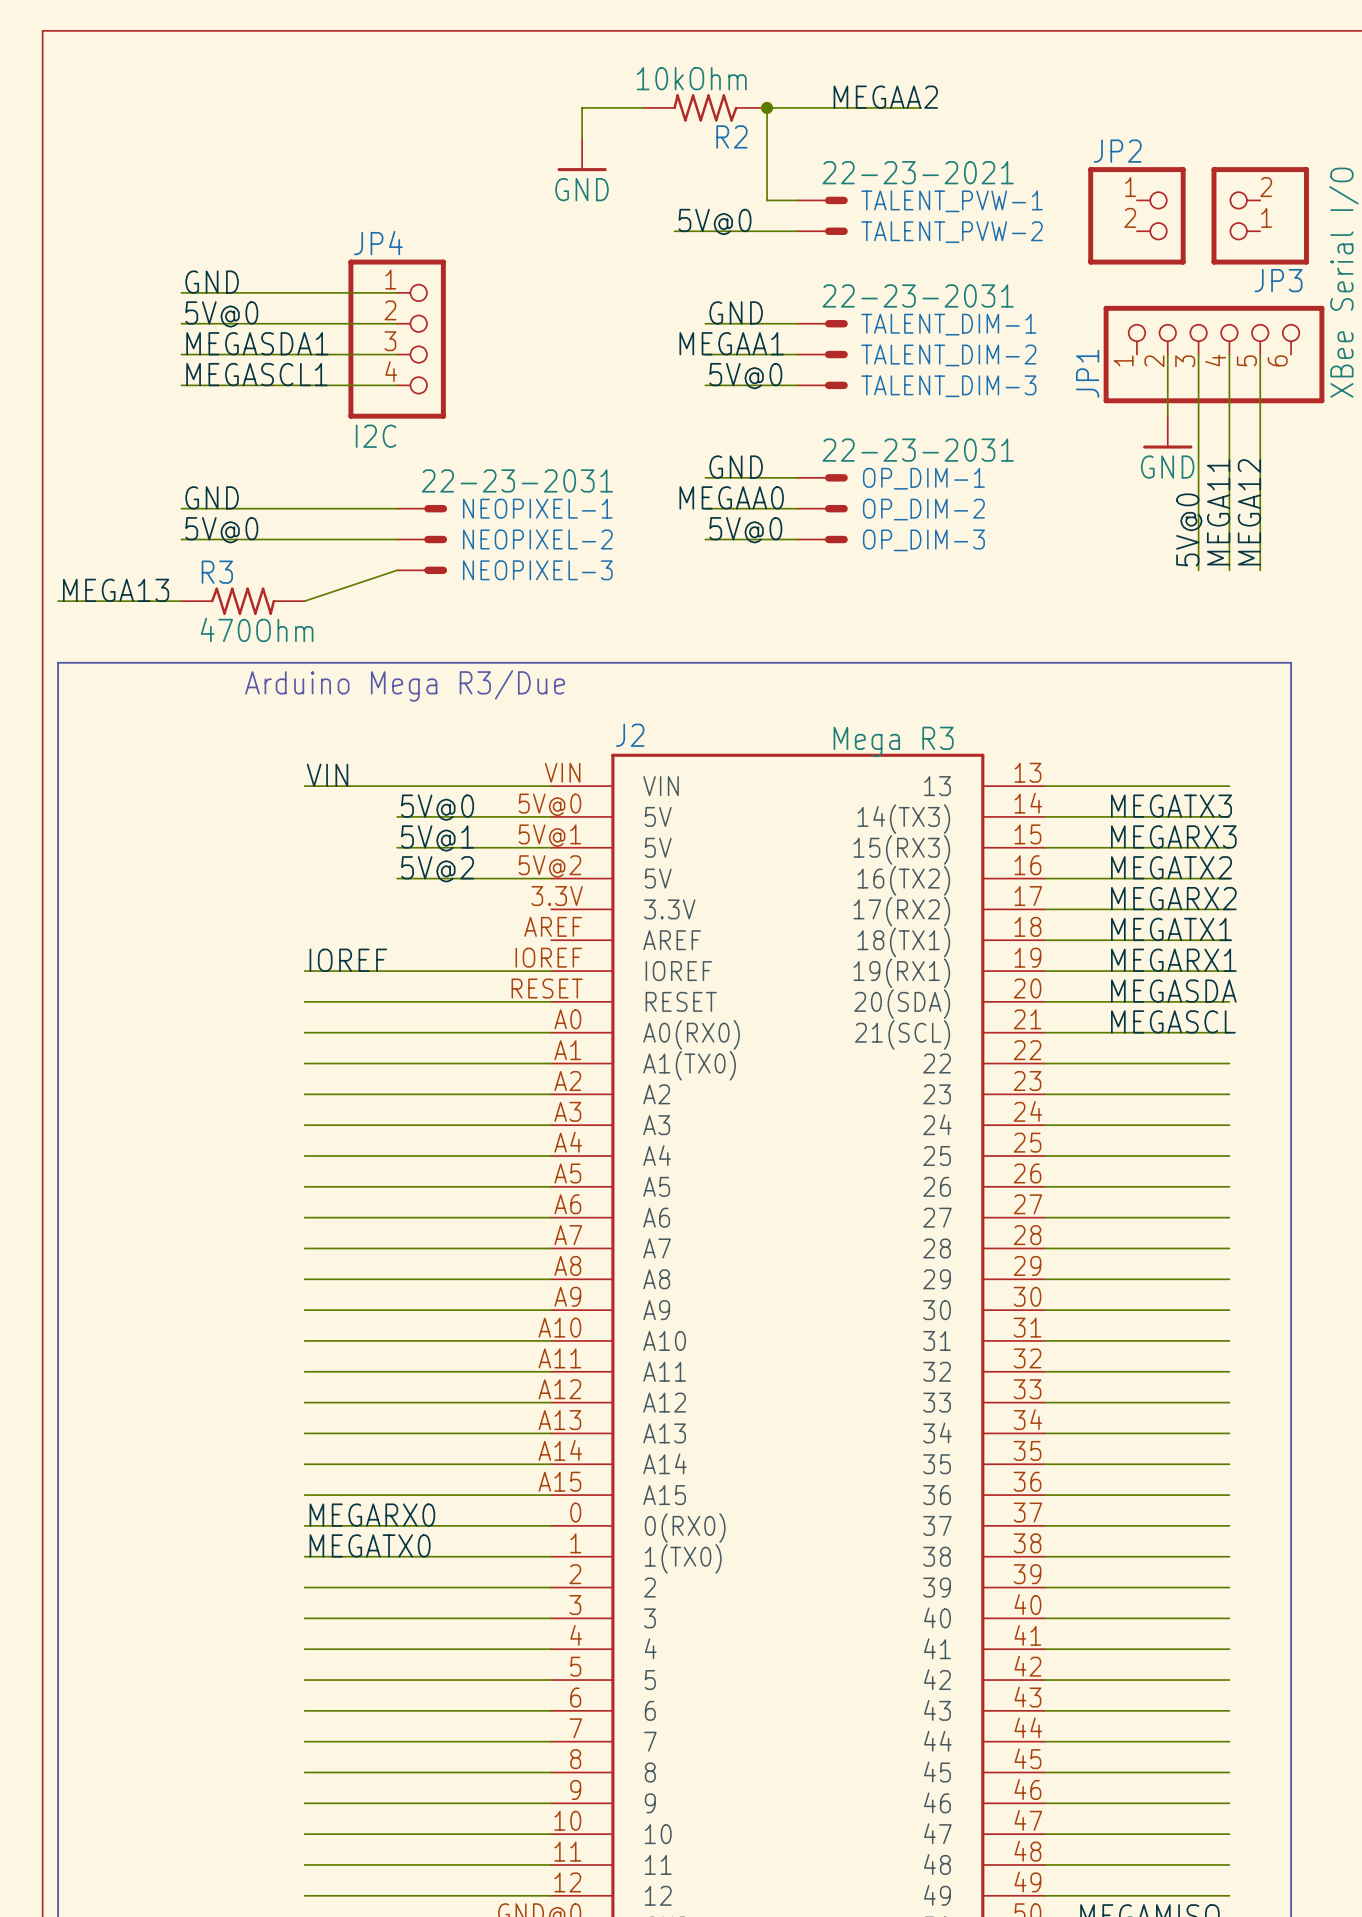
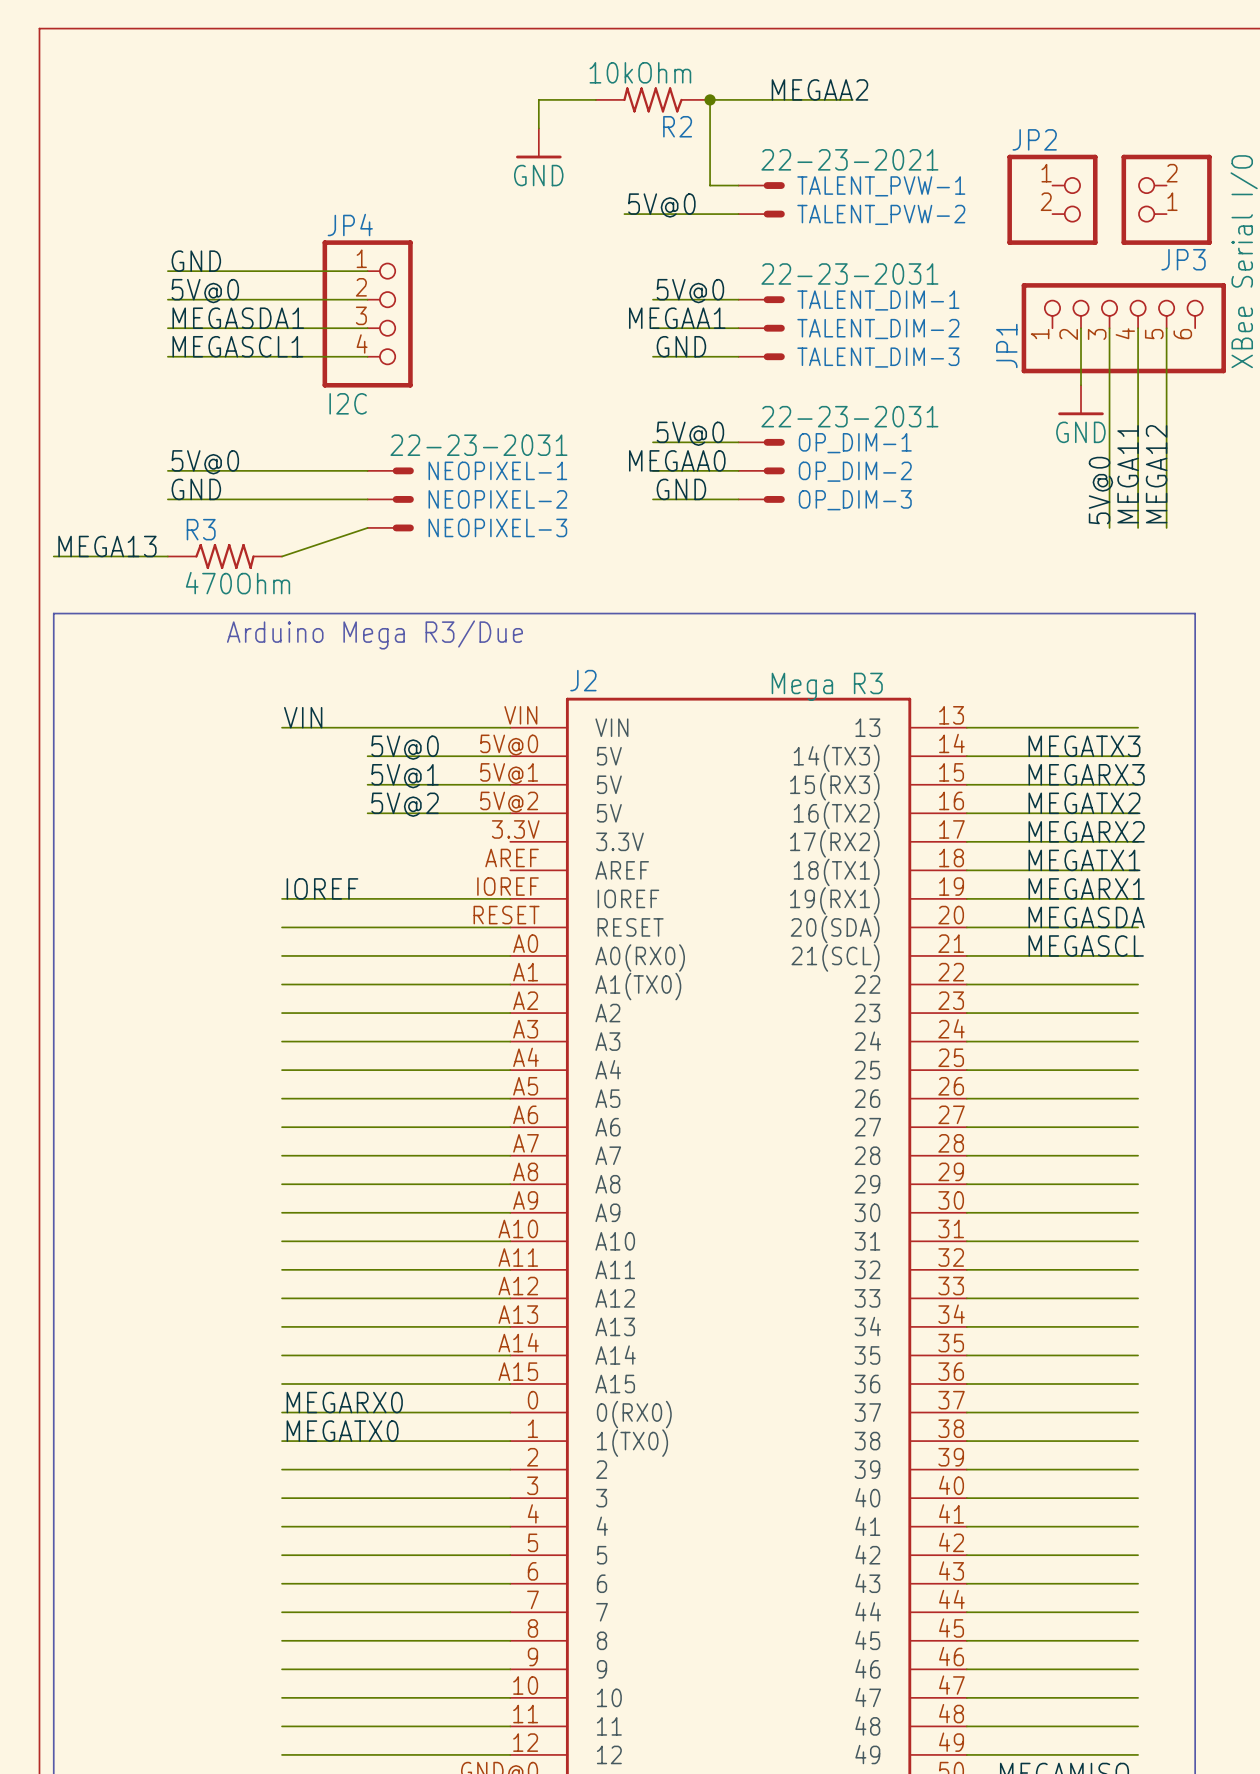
label: GND (736, 312) -> 5V@0 (690, 291)
label: 5V@0 (745, 376) -> GND (681, 346)
label: GND (736, 467) -> 5V@0 (690, 433)
label: GND (212, 497) -> 5V@0 (205, 462)
label: 5V@0 (221, 530) -> GND (196, 489)
label: 5V@0 (745, 530) -> GND (681, 489)

